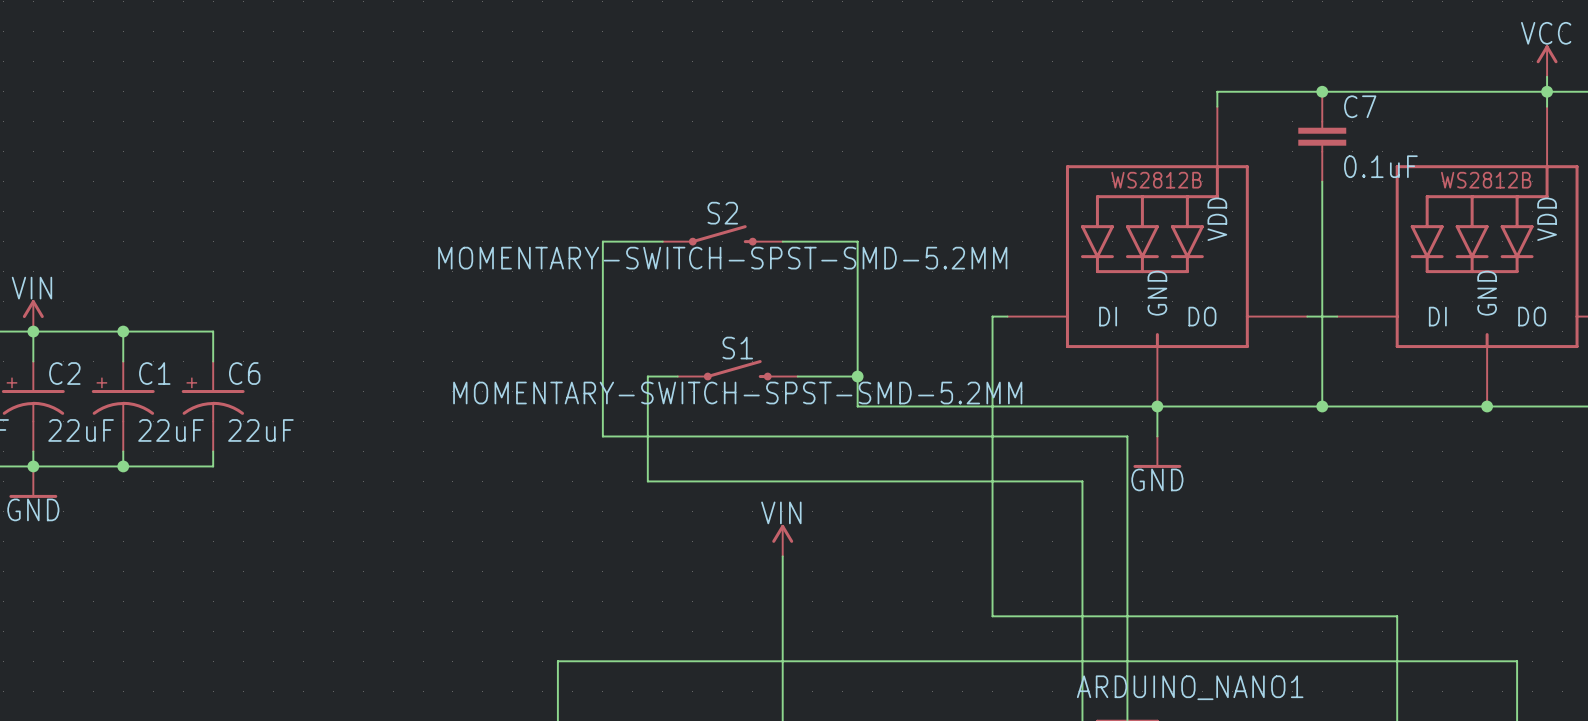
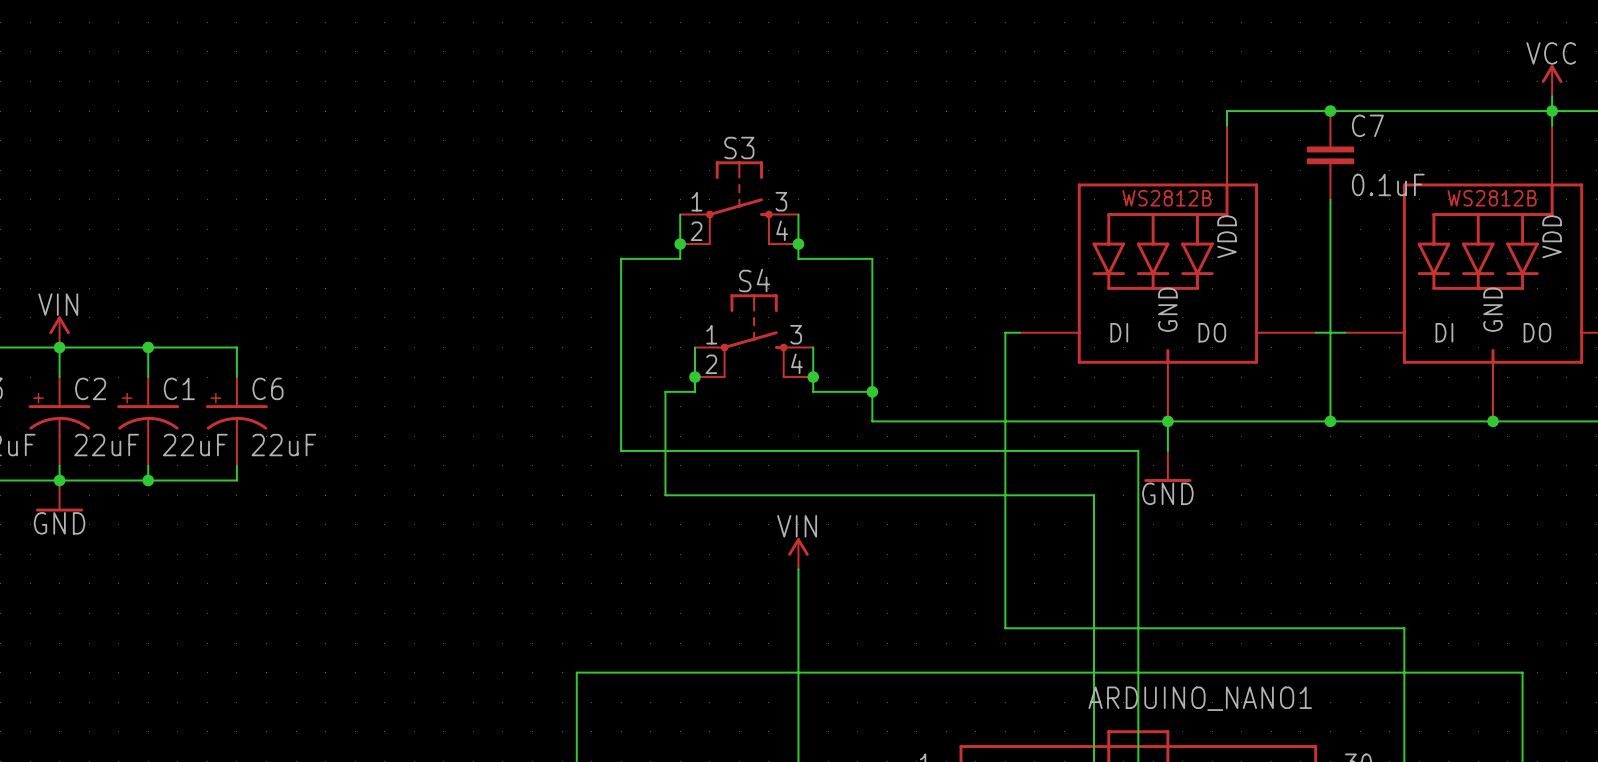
S3: none -> (739, 203)
wire: none -> (680, 214) (680, 258)
wire: none -> (798, 214) (798, 258)
junction: none -> (680, 244)
junction: none -> (798, 244)
S2: MOMENTARY-SWITCH-SPST-SMD-5.2MM (722, 235) -> none
S4: none -> (754, 336)
wire: none -> (695, 347) (695, 391)
wire: none -> (813, 347) (813, 391)
junction: none -> (695, 377)
junction: none -> (813, 377)
S1: MOMENTARY-SWITCH-SPST-SMD-5.2MM (737, 370) -> none

